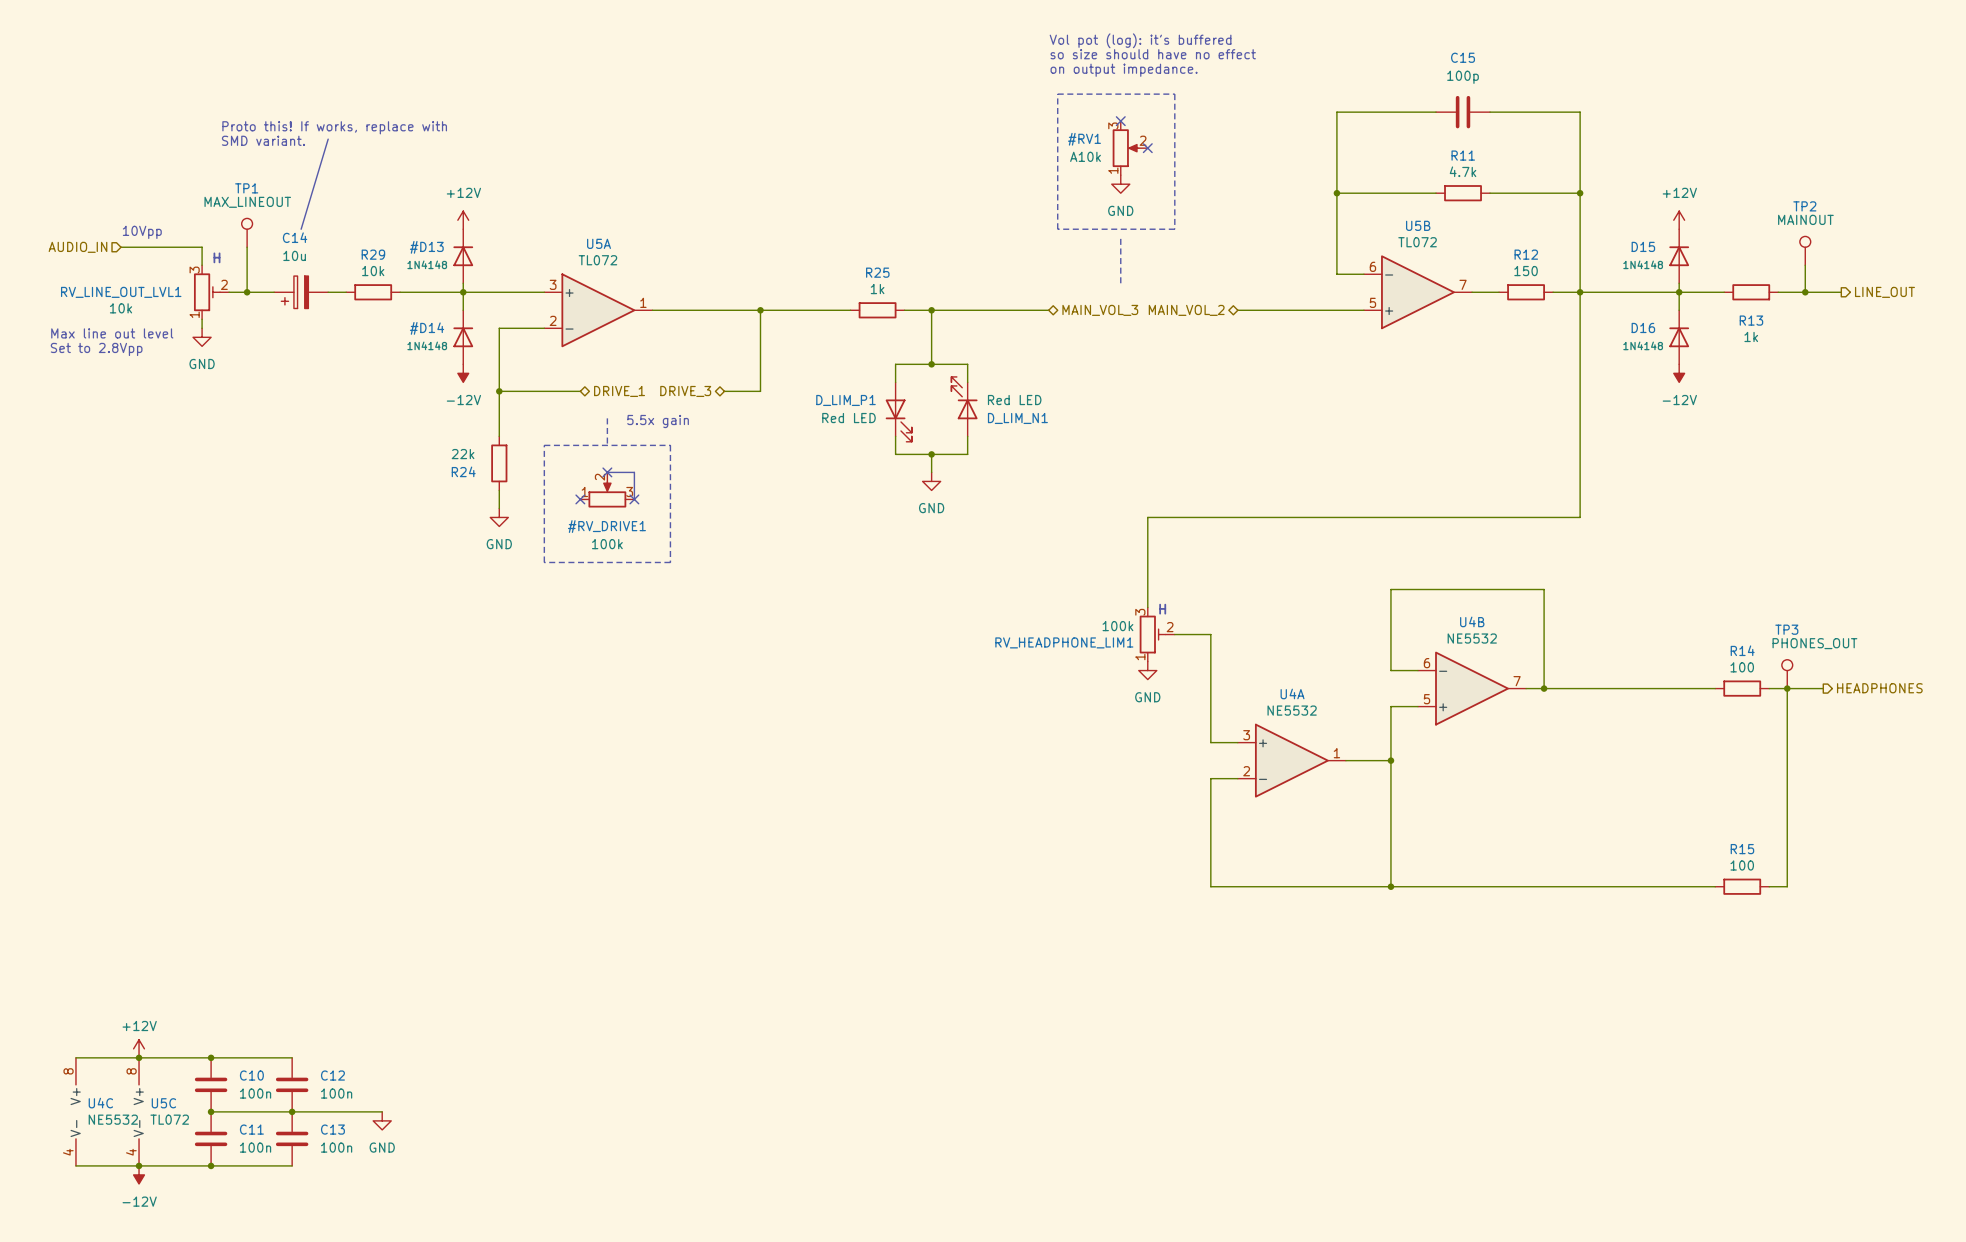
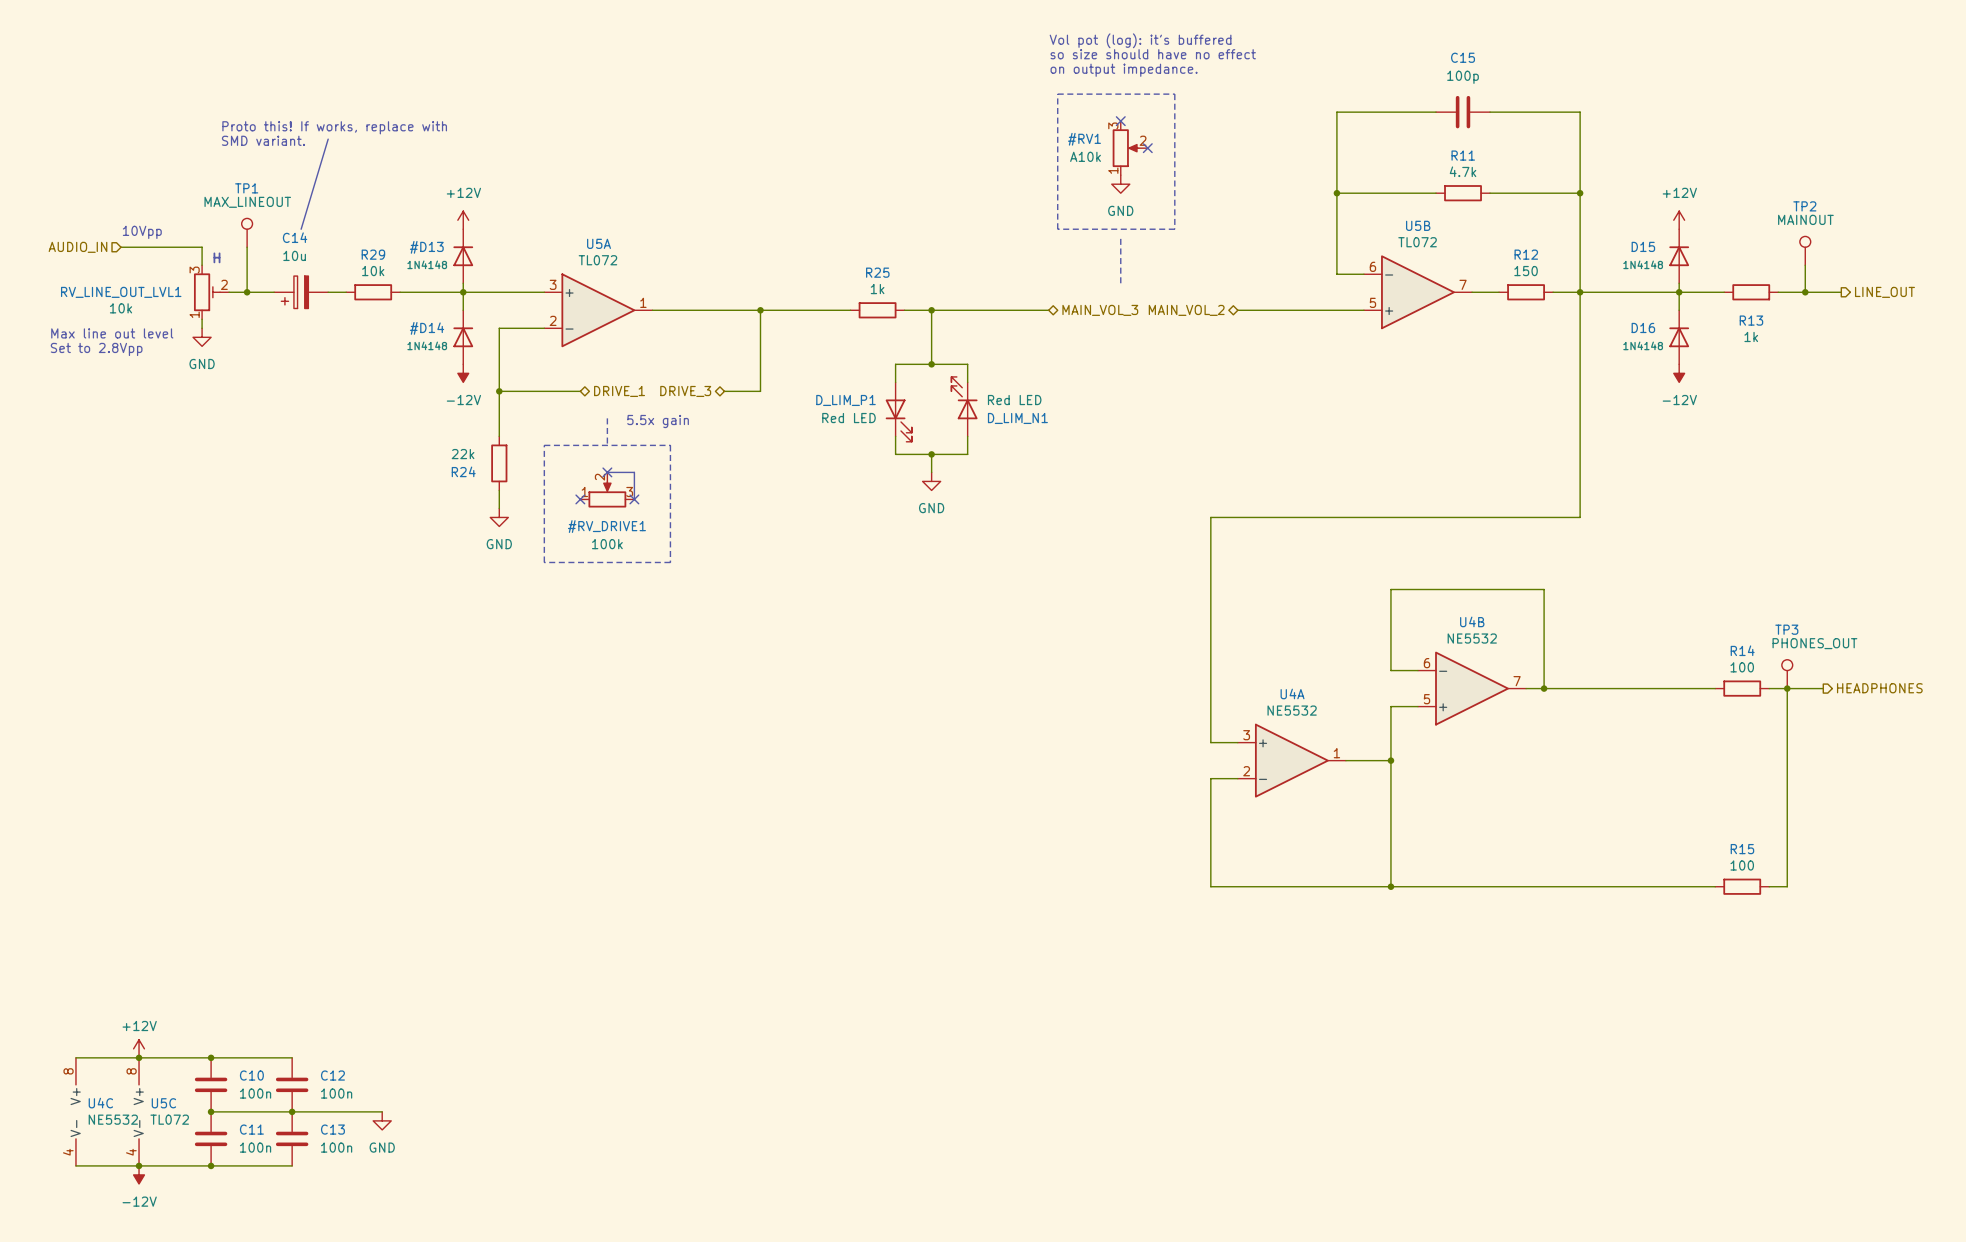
wire: (1210, 517) (1147, 517) (1147, 607) -> (1210, 517) (1210, 634)
text: H (1162, 609) -> none
RV_HEADPHONE_LIM1: 100k (1157, 634) -> none
wire: (1174, 634) (1210, 634) -> none
power symbol: GND (1147, 670) -> none

